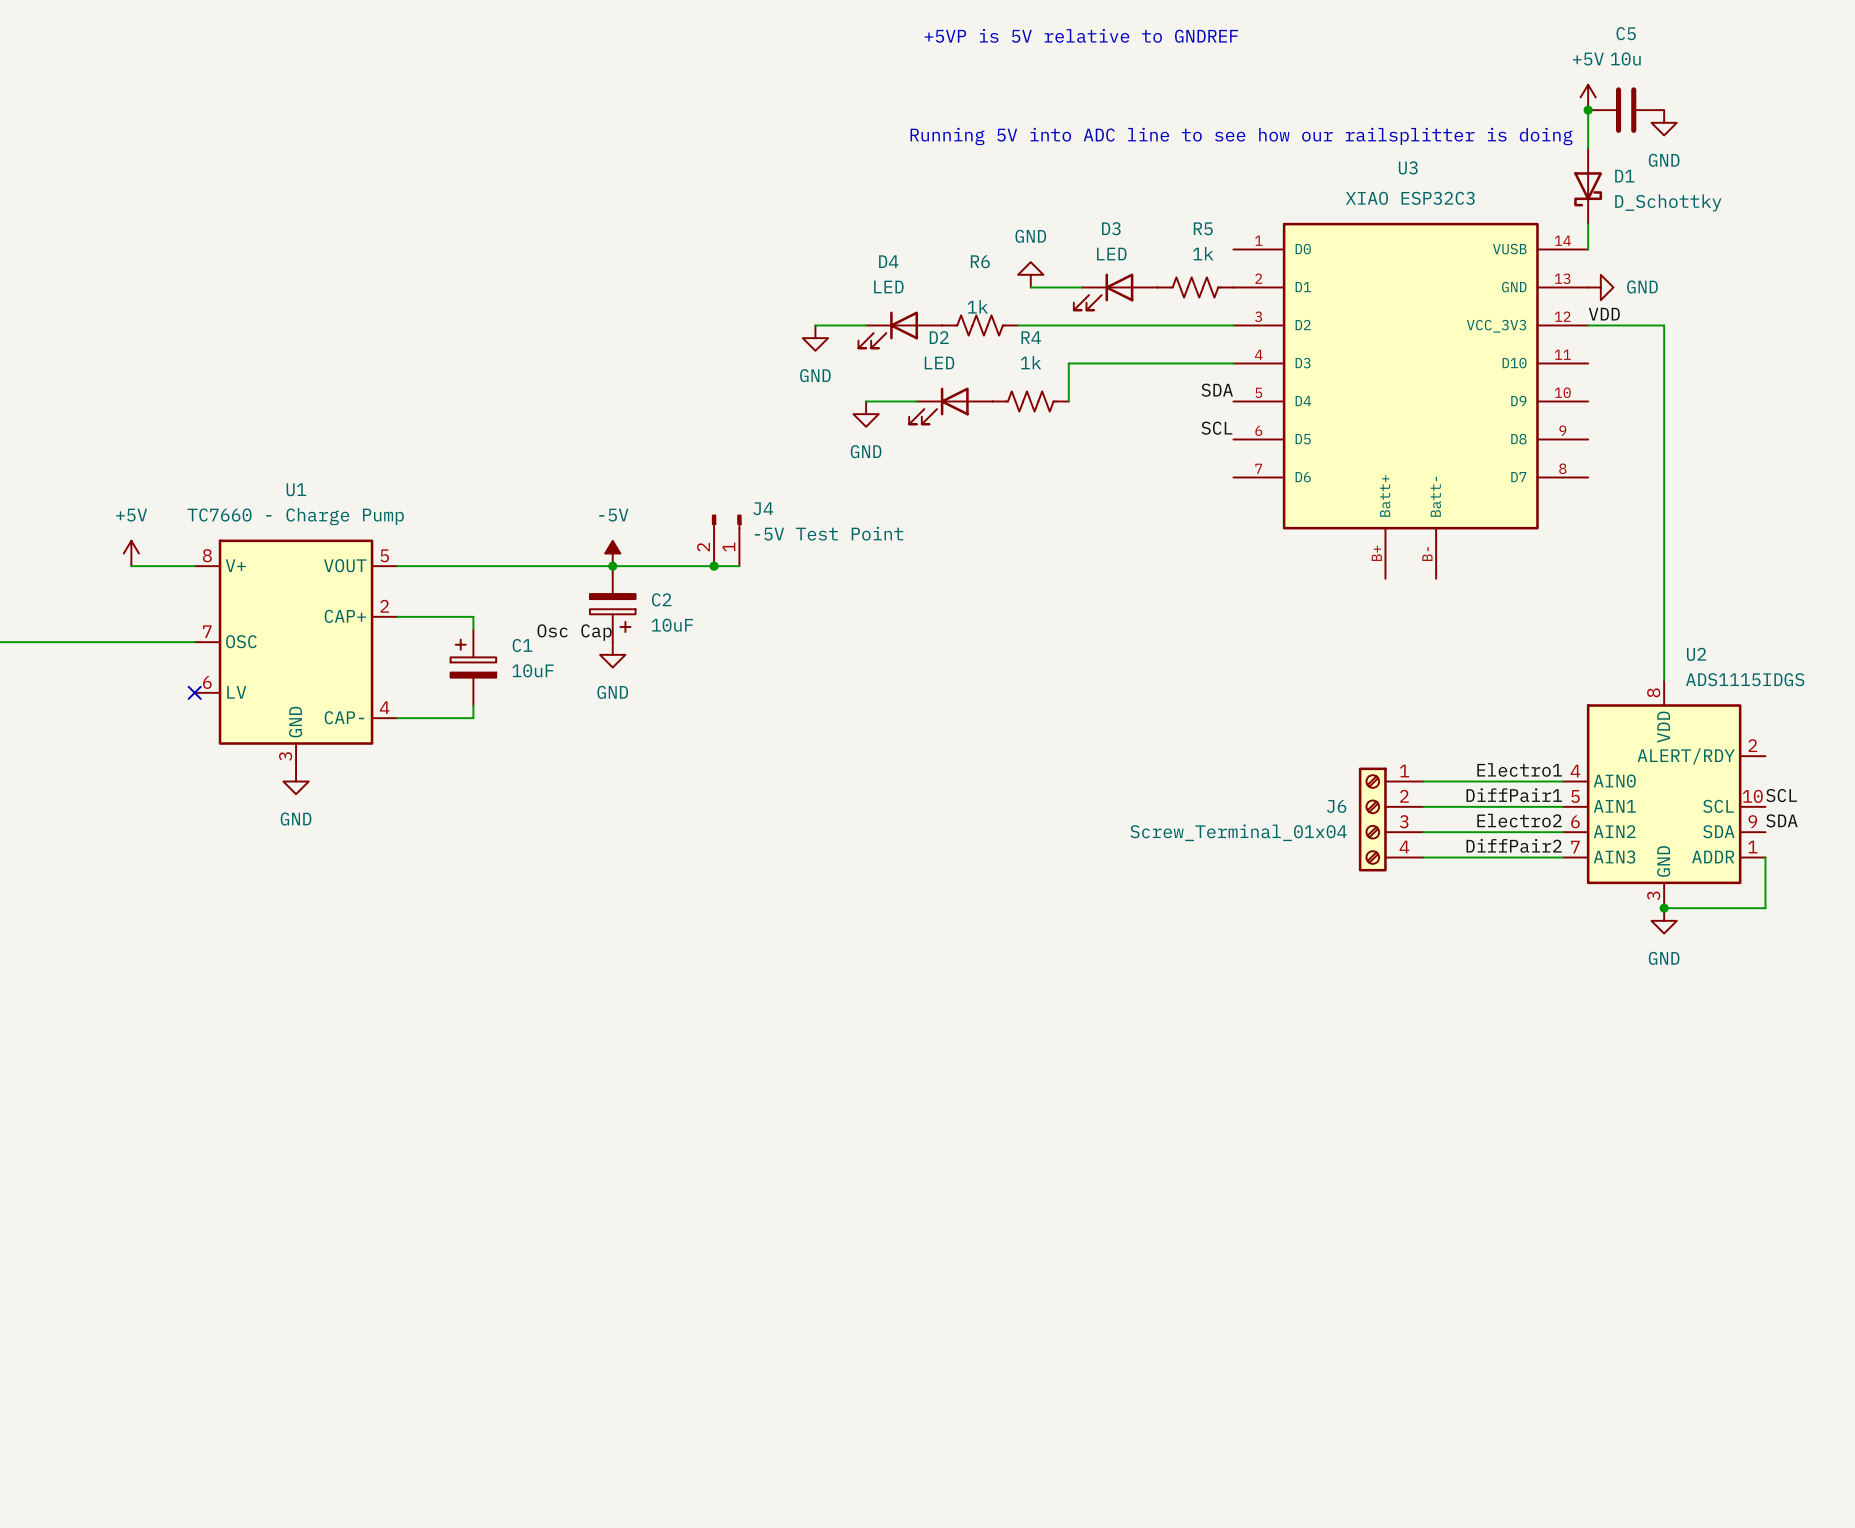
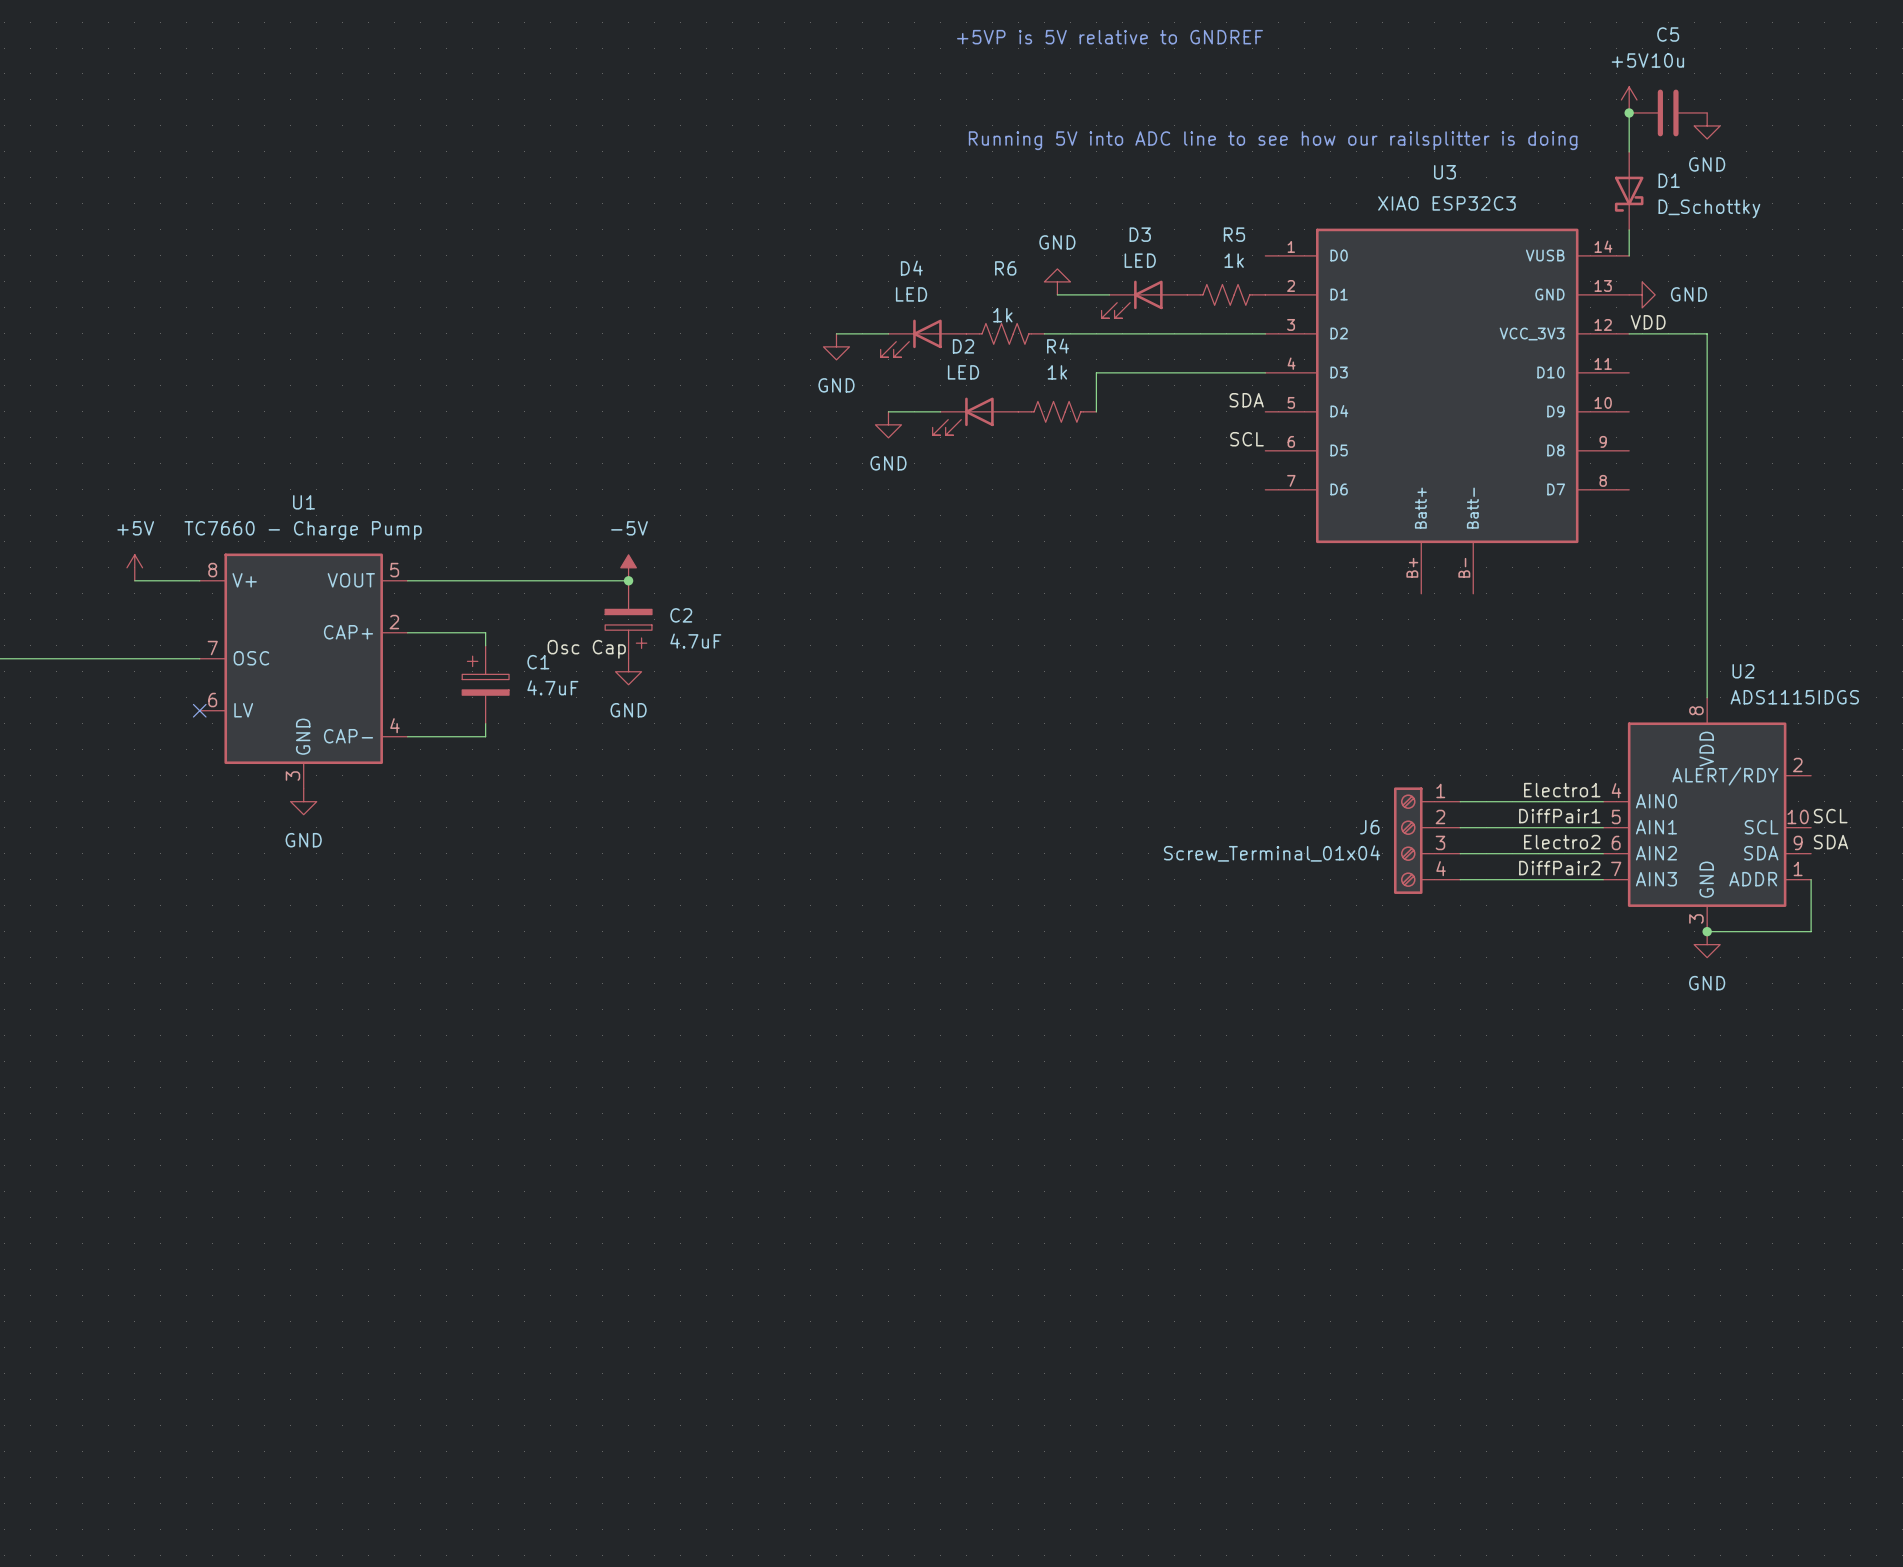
J4: -5V Test Point (726, 540) -> none
wire: (612, 566) (739, 566) -> none
junction: (714, 566) -> none
C2 value: 10uF (672, 625) -> 4.7uF (695, 641)
C1 value: 10uF (533, 670) -> 4.7uF (552, 687)

